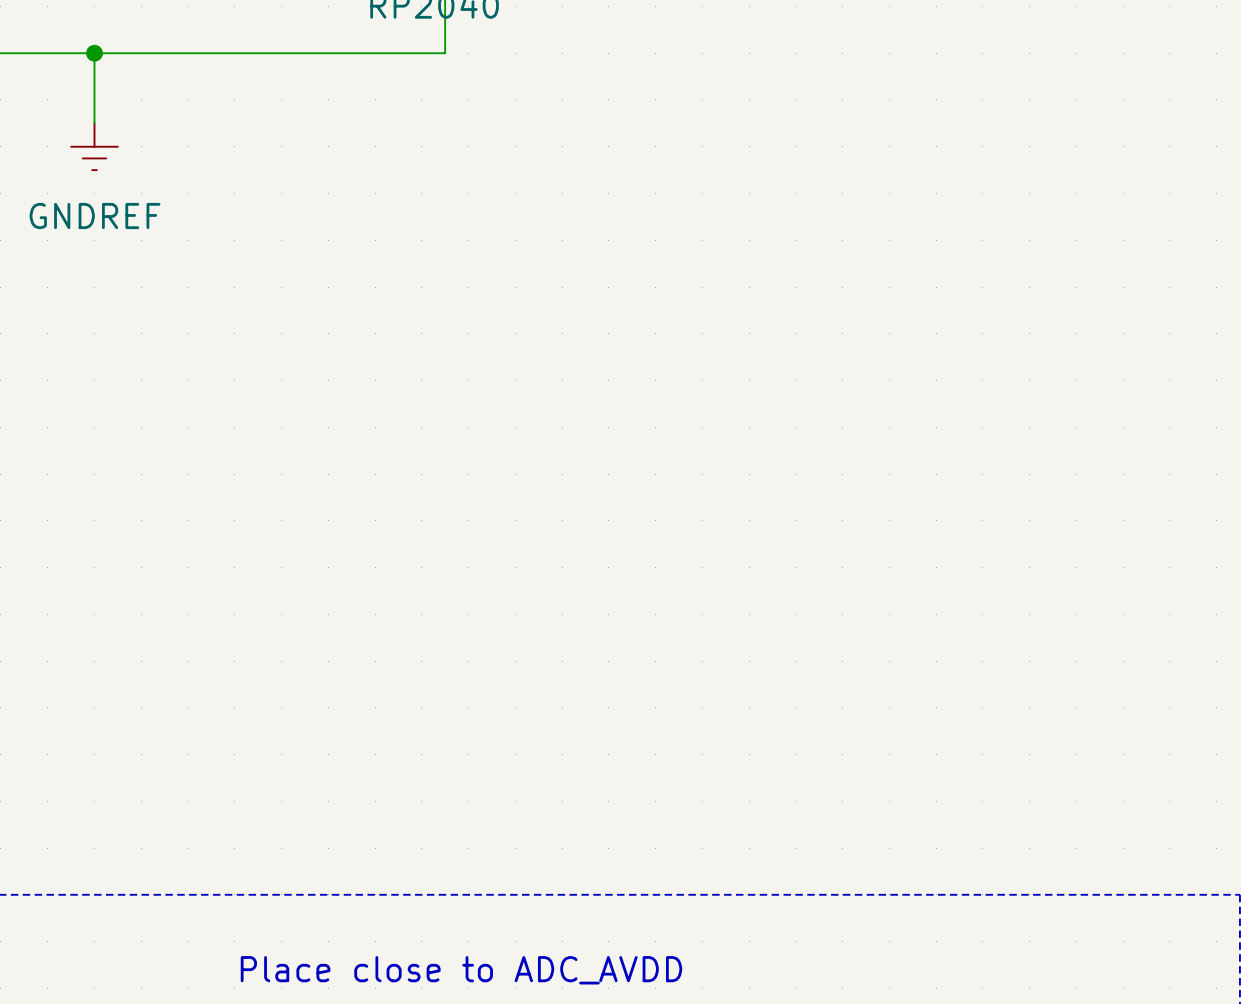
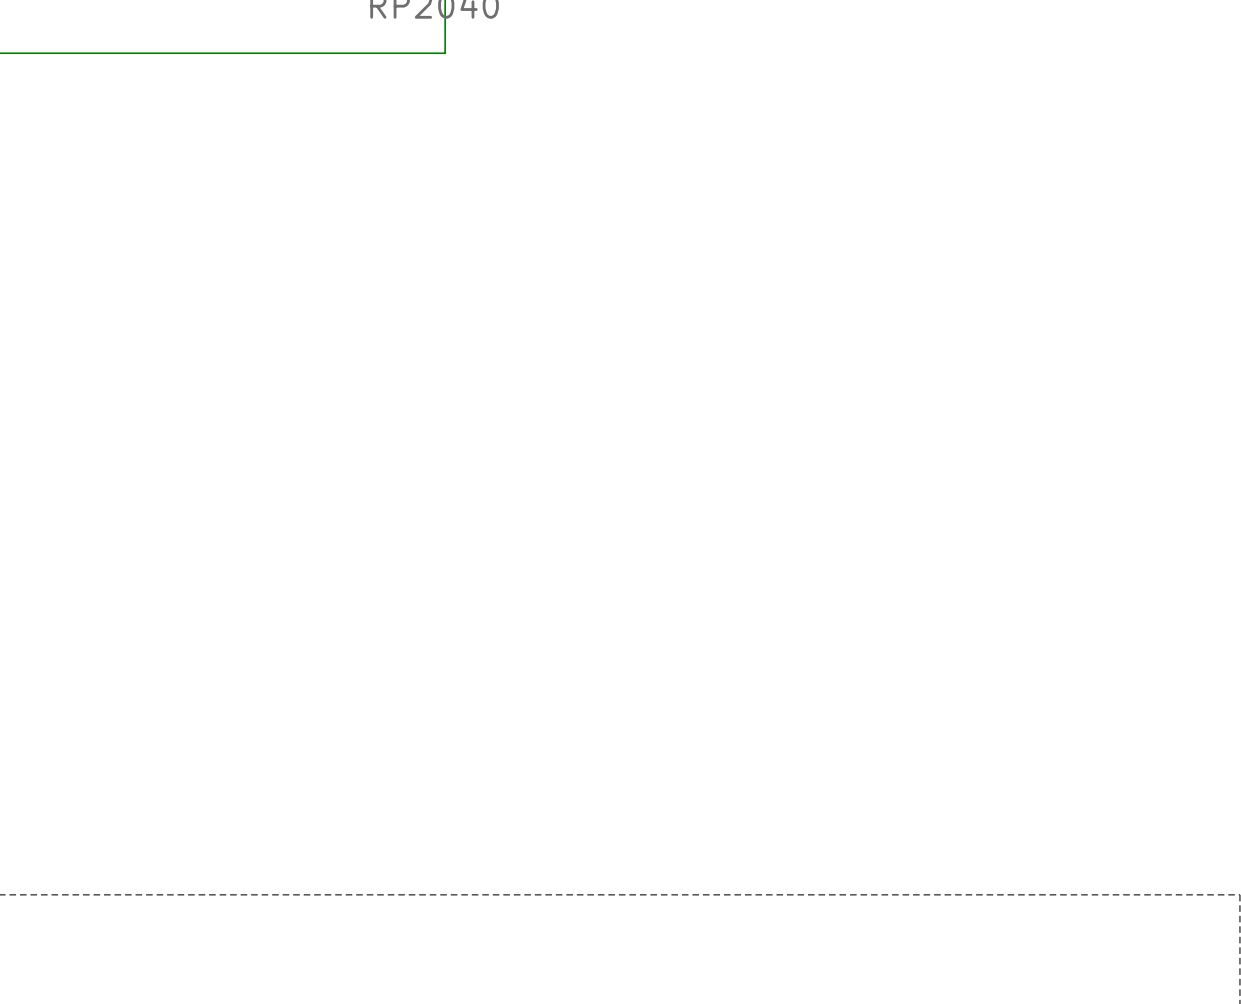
wire: (94, 53) (94, 123) -> none
junction: (94, 53) -> none
power symbol: GNDREF (94, 146) -> none
text: Place close to ADC_AVDD (461, 970) -> none

